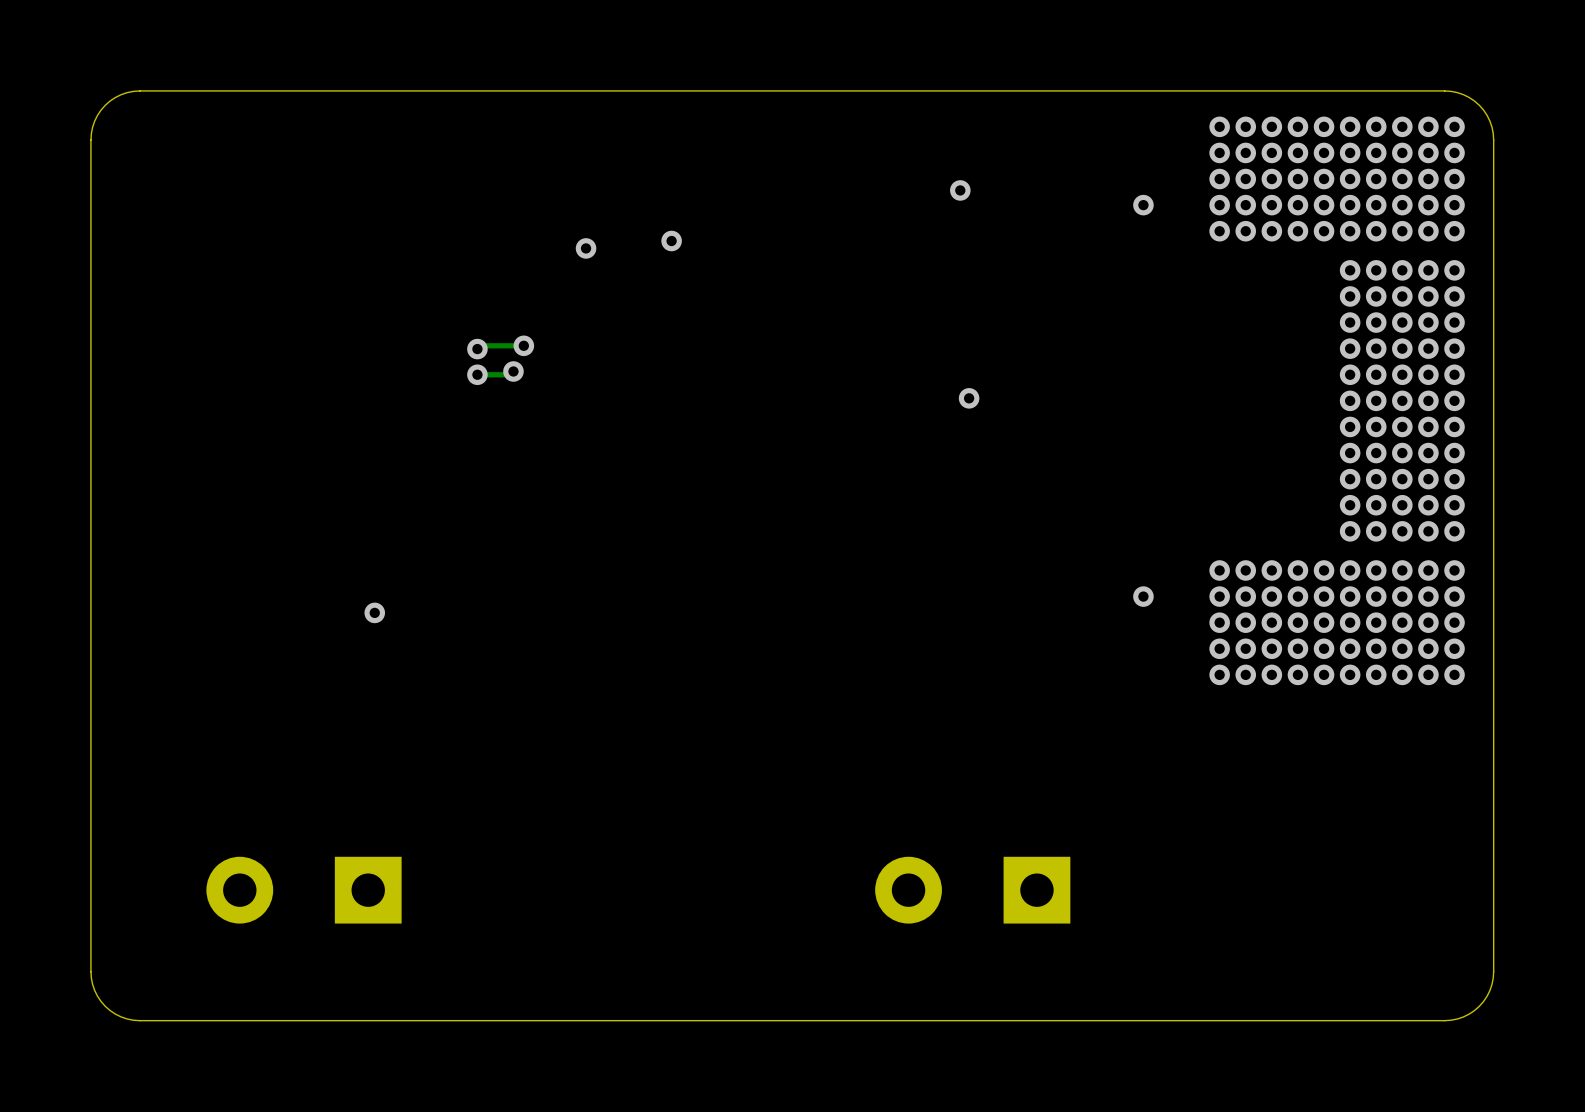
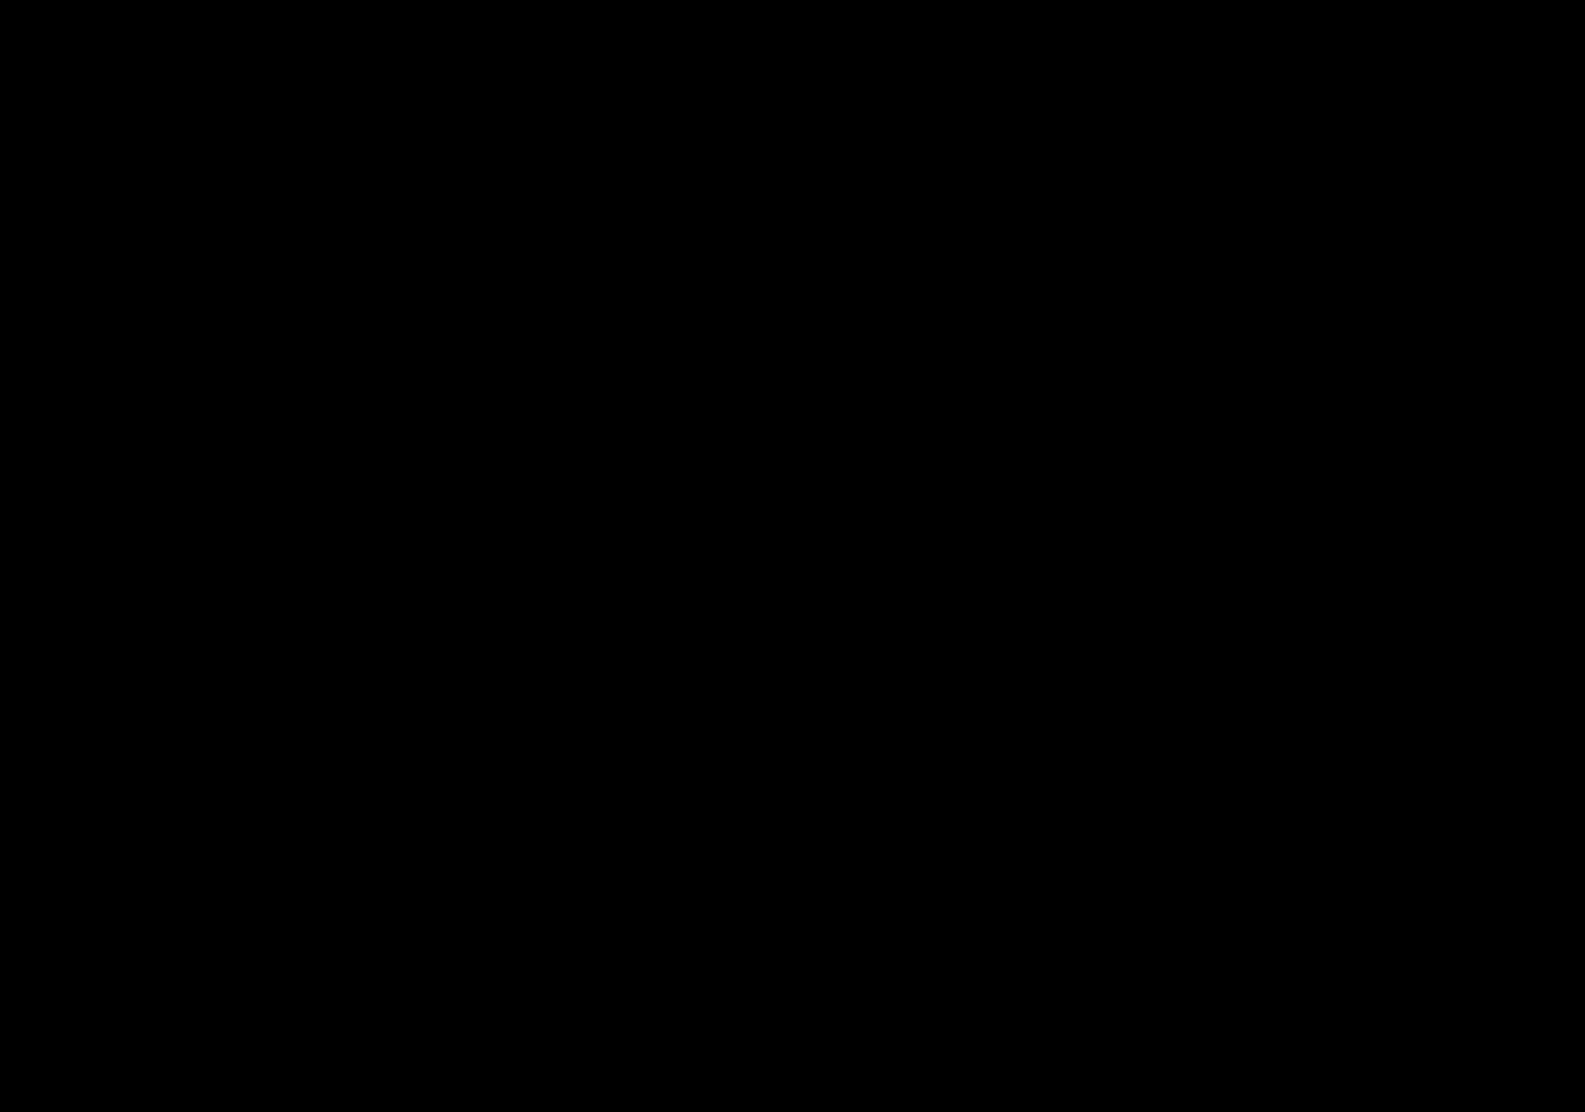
board edge: (139, 90) (1444, 90) (1463, 94) (1474, 101) (1487, 115) (1492, 127) (1493, 139) (1493, 971) (1489, 990) (1483, 1001) (1469, 1014) (1457, 1018) (1444, 1020) (139, 1020) (121, 1016) (110, 1010) (97, 996) (92, 984) (90, 971) (90, 139) (94, 121) (105, 105) (121, 94) (139, 90) -> none
via: (1219, 126) -> none
via: (1245, 126) -> none
via: (1271, 126) -> none
via: (1297, 126) -> none
via: (1324, 126) -> none
via: (1350, 126) -> none
via: (1376, 126) -> none
via: (1402, 126) -> none
via: (1428, 126) -> none
via: (1454, 126) -> none
via: (1219, 152) -> none
via: (1245, 152) -> none
via: (1271, 152) -> none
via: (1297, 152) -> none
via: (1324, 152) -> none
via: (1350, 152) -> none
via: (1376, 152) -> none
via: (1402, 152) -> none
via: (1428, 152) -> none
via: (1454, 152) -> none
via: (1219, 179) -> none
via: (1245, 179) -> none
via: (1271, 179) -> none
via: (1297, 179) -> none
via: (1324, 179) -> none
via: (1350, 179) -> none
via: (1376, 179) -> none
via: (1402, 179) -> none
via: (1428, 179) -> none
via: (1454, 179) -> none
via: (960, 190) -> none
via: (1143, 205) -> none
via: (1219, 205) -> none
via: (1245, 205) -> none
via: (1271, 205) -> none
via: (1297, 205) -> none
via: (1324, 205) -> none
via: (1350, 205) -> none
via: (1376, 205) -> none
via: (1402, 205) -> none
via: (1428, 205) -> none
via: (1454, 205) -> none
via: (1219, 231) -> none
via: (1245, 231) -> none
via: (1271, 231) -> none
via: (1297, 231) -> none
via: (1324, 231) -> none
via: (1350, 231) -> none
via: (1376, 231) -> none
via: (1402, 231) -> none
via: (1428, 231) -> none
via: (1454, 231) -> none
via: (671, 241) -> none
via: (586, 248) -> none
via: (1350, 270) -> none
via: (1376, 270) -> none
via: (1402, 270) -> none
via: (1428, 270) -> none
via: (1454, 270) -> none
via: (1350, 296) -> none
via: (1376, 296) -> none
via: (1402, 296) -> none
via: (1428, 296) -> none
via: (1454, 296) -> none
via: (1350, 322) -> none
via: (1376, 322) -> none
via: (1402, 322) -> none
via: (1428, 322) -> none
via: (1454, 322) -> none
track: (523, 345) (480, 345) (477, 349) -> none
via: (523, 345) -> none
via: (1350, 348) -> none
via: (1376, 348) -> none
via: (1402, 348) -> none
via: (1428, 348) -> none
via: (1454, 348) -> none
via: (477, 349) -> none
track: (513, 371) (510, 374) (477, 374) -> none
via: (513, 371) -> none
via: (477, 374) -> none
via: (1350, 374) -> none
via: (1376, 374) -> none
via: (1402, 374) -> none
via: (1428, 374) -> none
via: (1454, 374) -> none
via: (969, 398) -> none
via: (1350, 400) -> none
via: (1376, 400) -> none
via: (1402, 400) -> none
via: (1428, 400) -> none
via: (1454, 400) -> none
via: (1350, 426) -> none
via: (1376, 426) -> none
via: (1402, 426) -> none
via: (1428, 426) -> none
via: (1454, 426) -> none
via: (1350, 453) -> none
via: (1376, 453) -> none
via: (1402, 453) -> none
via: (1428, 453) -> none
via: (1454, 453) -> none
via: (1350, 479) -> none
via: (1376, 479) -> none
via: (1402, 479) -> none
via: (1428, 479) -> none
via: (1454, 479) -> none
via: (1350, 505) -> none
via: (1376, 505) -> none
via: (1402, 505) -> none
via: (1428, 505) -> none
via: (1454, 505) -> none
via: (1350, 531) -> none
via: (1376, 531) -> none
via: (1402, 531) -> none
via: (1428, 531) -> none
via: (1454, 531) -> none
via: (1219, 570) -> none
via: (1245, 570) -> none
via: (1271, 570) -> none
via: (1297, 570) -> none
via: (1324, 570) -> none
via: (1350, 570) -> none
via: (1376, 570) -> none
via: (1402, 570) -> none
via: (1428, 570) -> none
via: (1454, 570) -> none
via: (1143, 596) -> none
via: (1219, 596) -> none
via: (1245, 596) -> none
via: (1271, 596) -> none
via: (1297, 596) -> none
via: (1324, 596) -> none
via: (1350, 596) -> none
via: (1376, 596) -> none
via: (1402, 596) -> none
via: (1428, 596) -> none
via: (1454, 596) -> none
via: (374, 612) -> none
via: (1219, 622) -> none
via: (1245, 622) -> none
via: (1271, 622) -> none
via: (1297, 622) -> none
via: (1324, 622) -> none
via: (1350, 622) -> none
via: (1376, 622) -> none
via: (1402, 622) -> none
via: (1428, 622) -> none
via: (1454, 622) -> none
via: (1219, 648) -> none
via: (1245, 648) -> none
via: (1271, 648) -> none
via: (1297, 648) -> none
via: (1324, 648) -> none
via: (1350, 648) -> none
via: (1376, 648) -> none
via: (1402, 648) -> none
via: (1428, 648) -> none
via: (1454, 648) -> none
via: (1219, 674) -> none
via: (1245, 674) -> none
via: (1271, 674) -> none
via: (1297, 674) -> none
via: (1324, 674) -> none
via: (1350, 674) -> none
via: (1376, 674) -> none
via: (1402, 674) -> none
via: (1428, 674) -> none
via: (1454, 674) -> none
part: (304, 890) -> none
part: (972, 890) -> none

